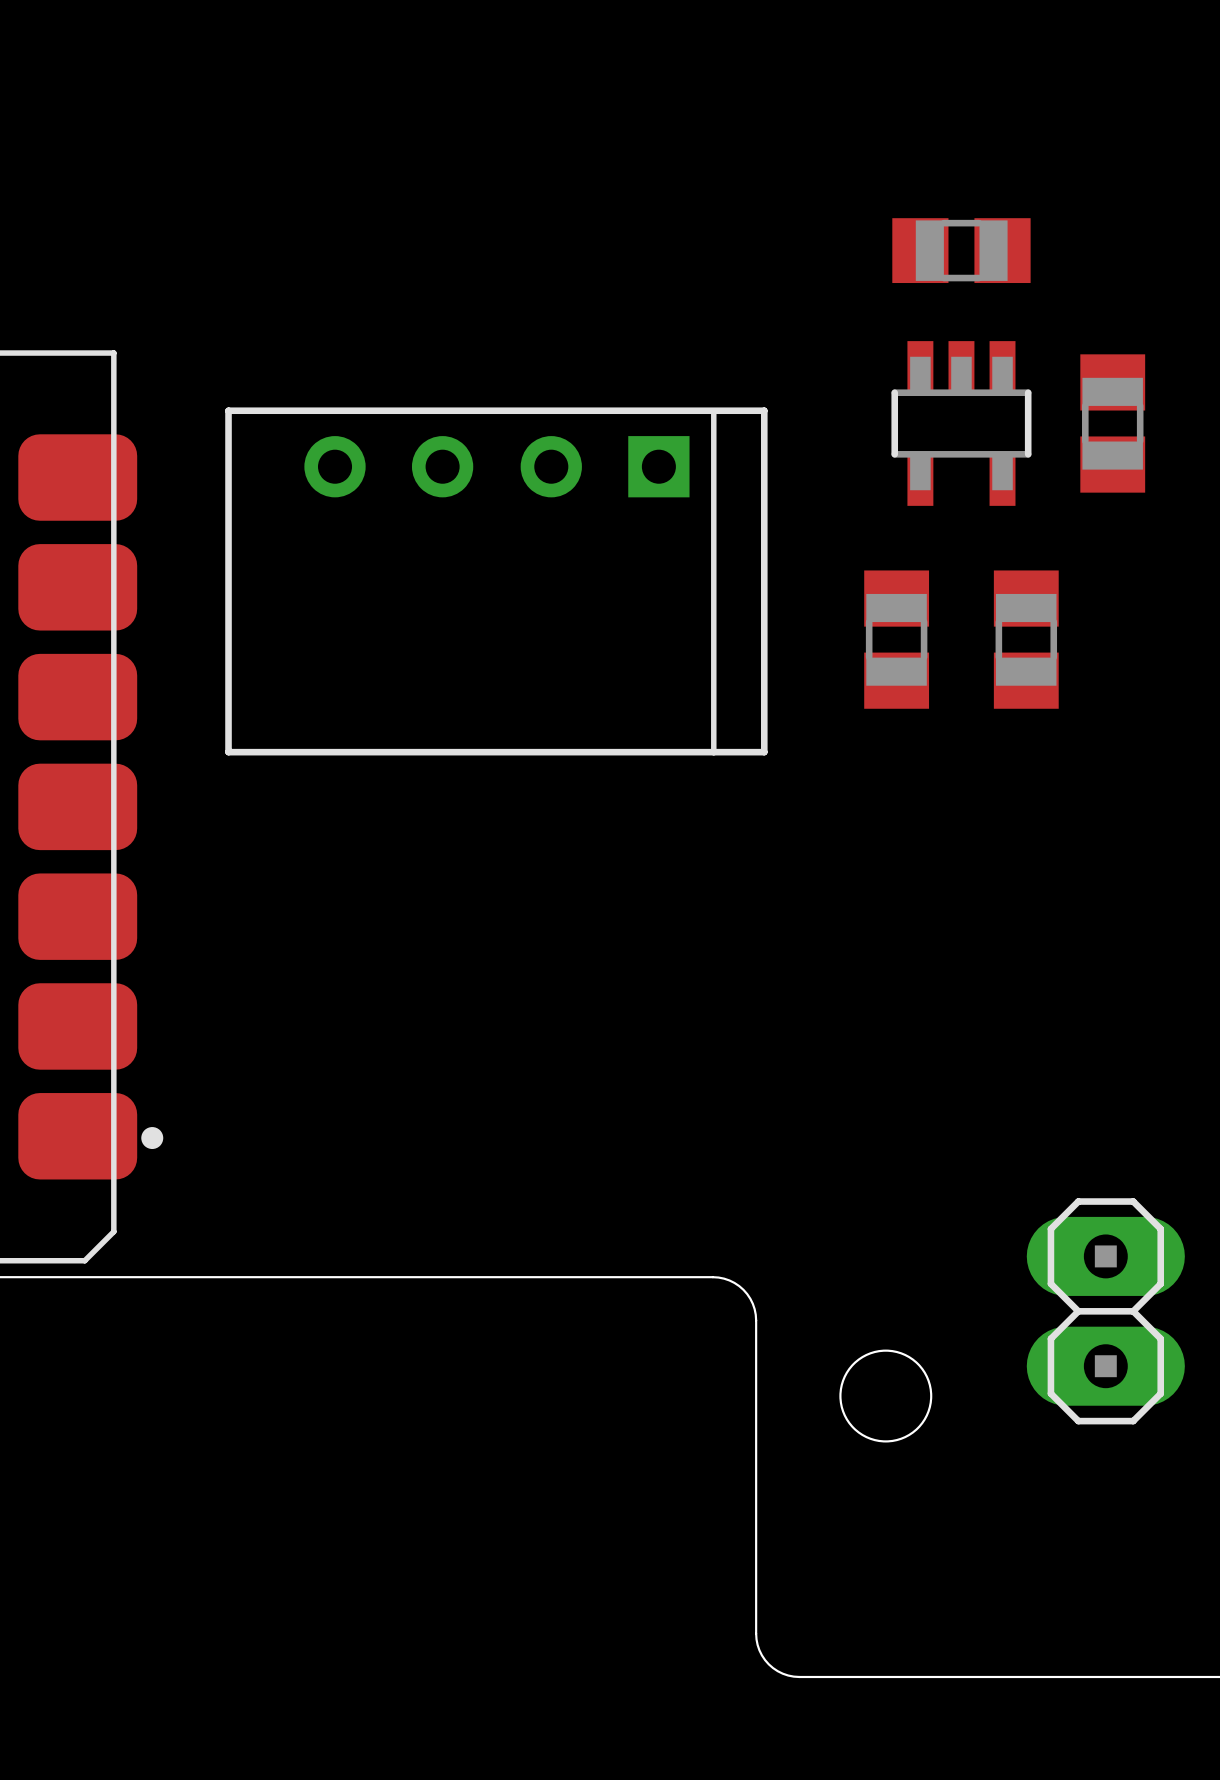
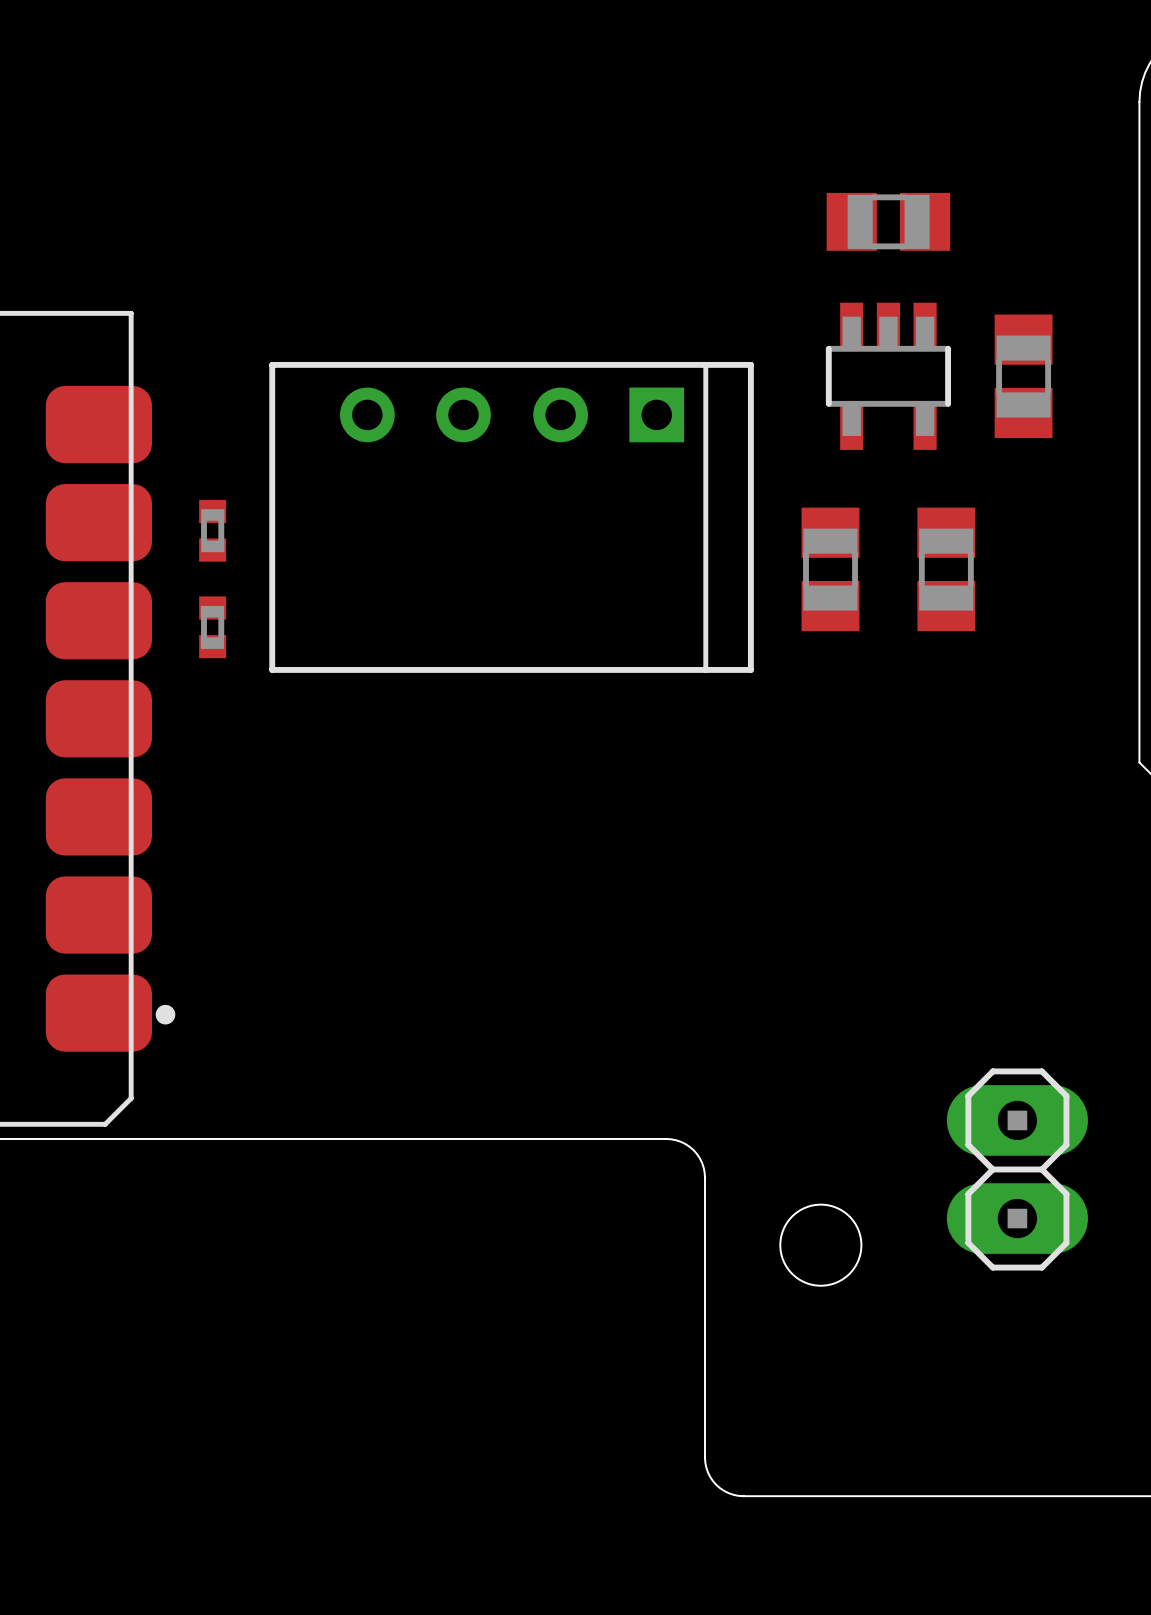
part position: (496, 581) -> (511, 517)
part: none -> (212, 530)
part: none -> (212, 627)

